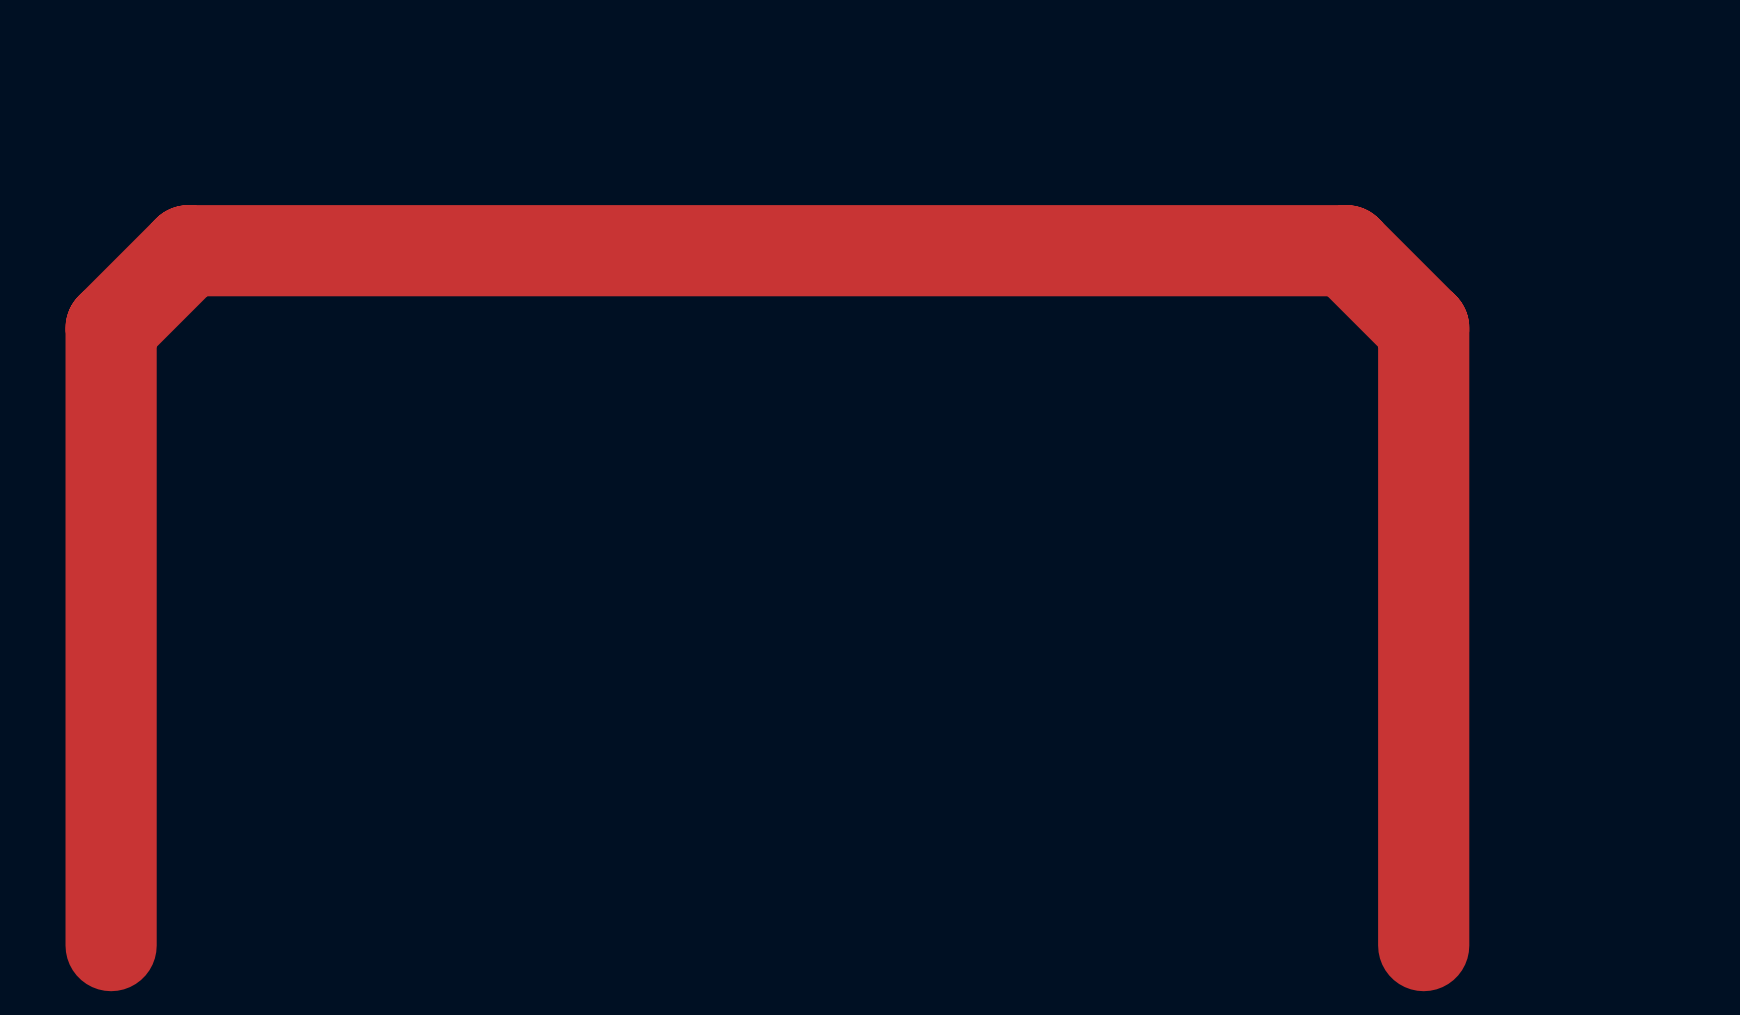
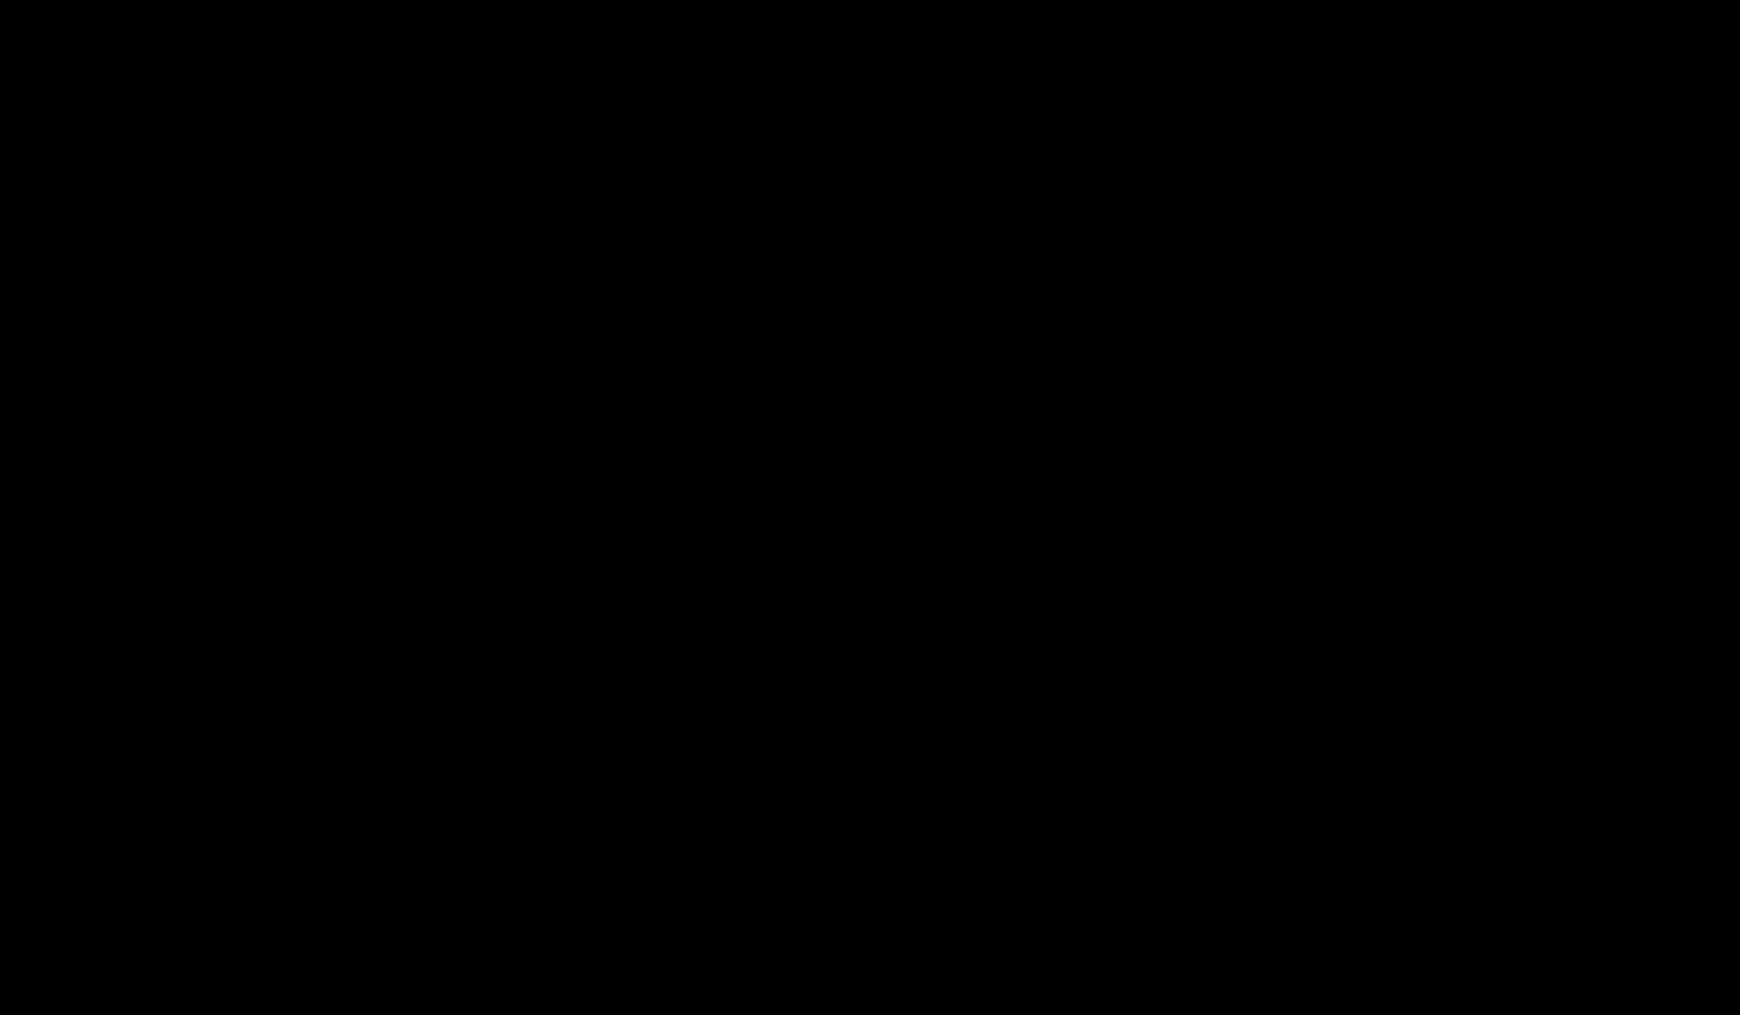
top track: (111, 945) (111, 327) (188, 250) (1346, 250) (1423, 327) (1423, 945) -> none

